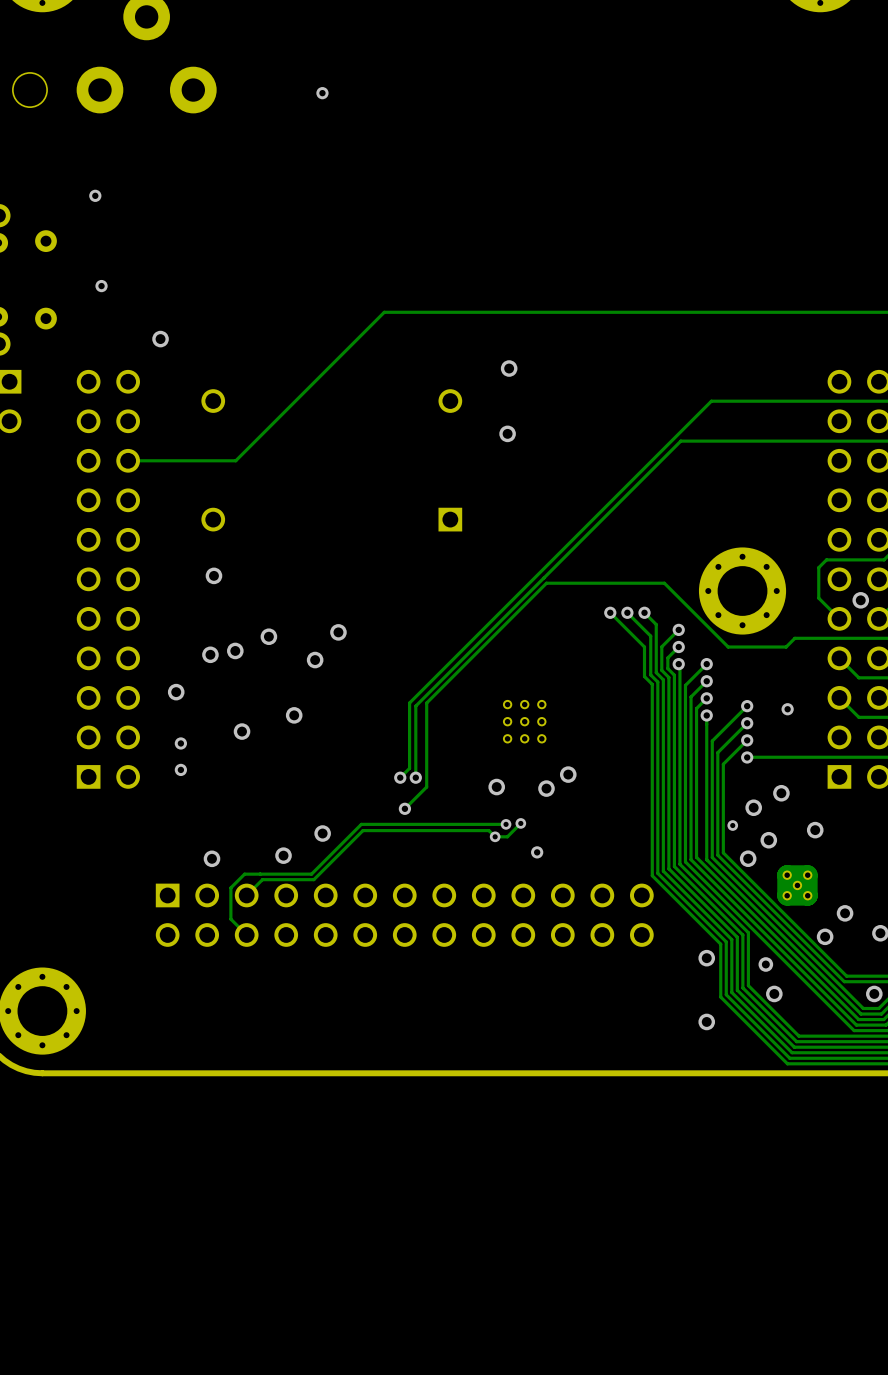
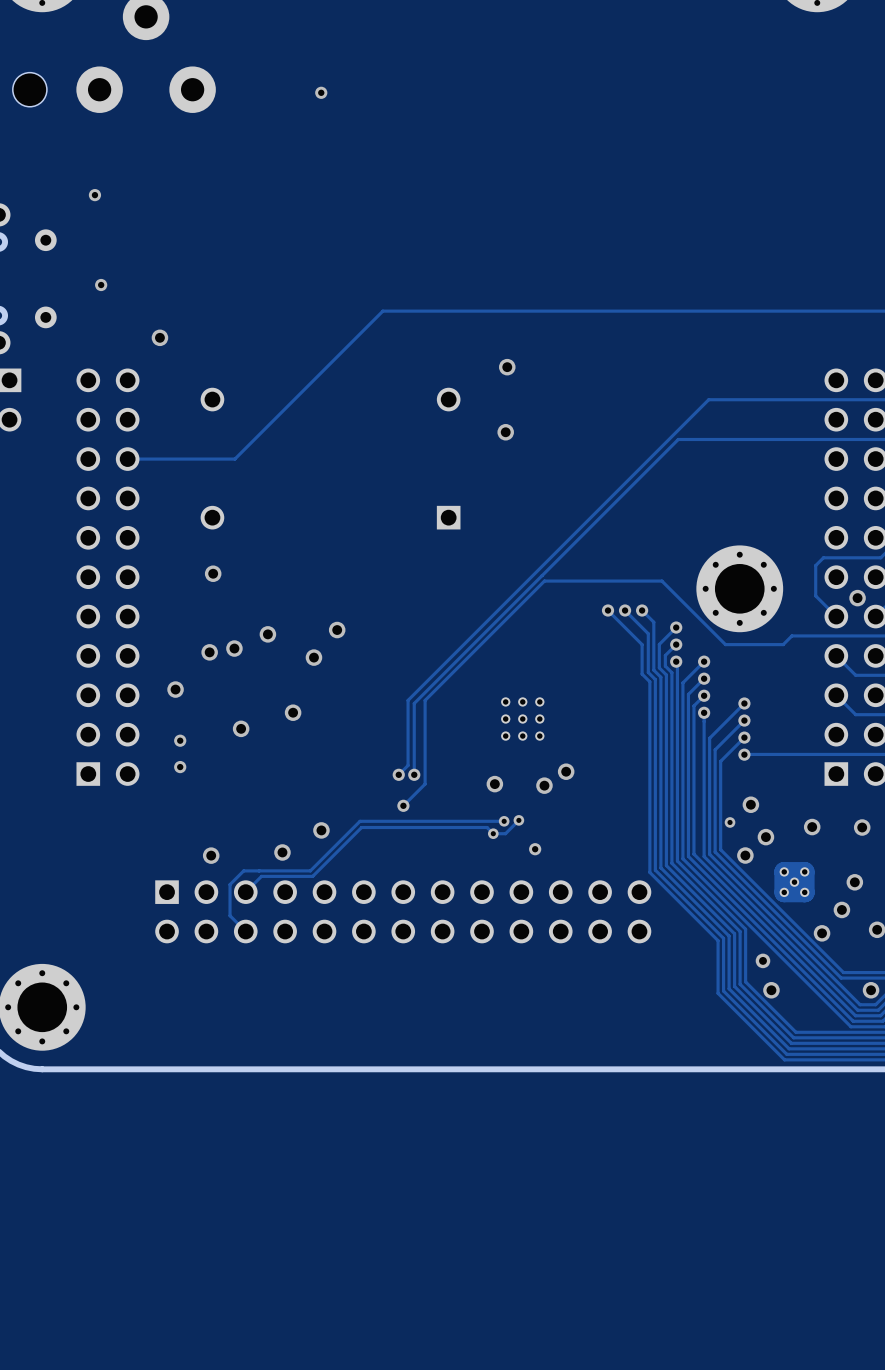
via: (787, 709) -> none
via: (781, 793) -> none
via: none -> (862, 827)
via: none -> (854, 882)
via: (706, 958) -> none
via: (706, 1021) -> none

